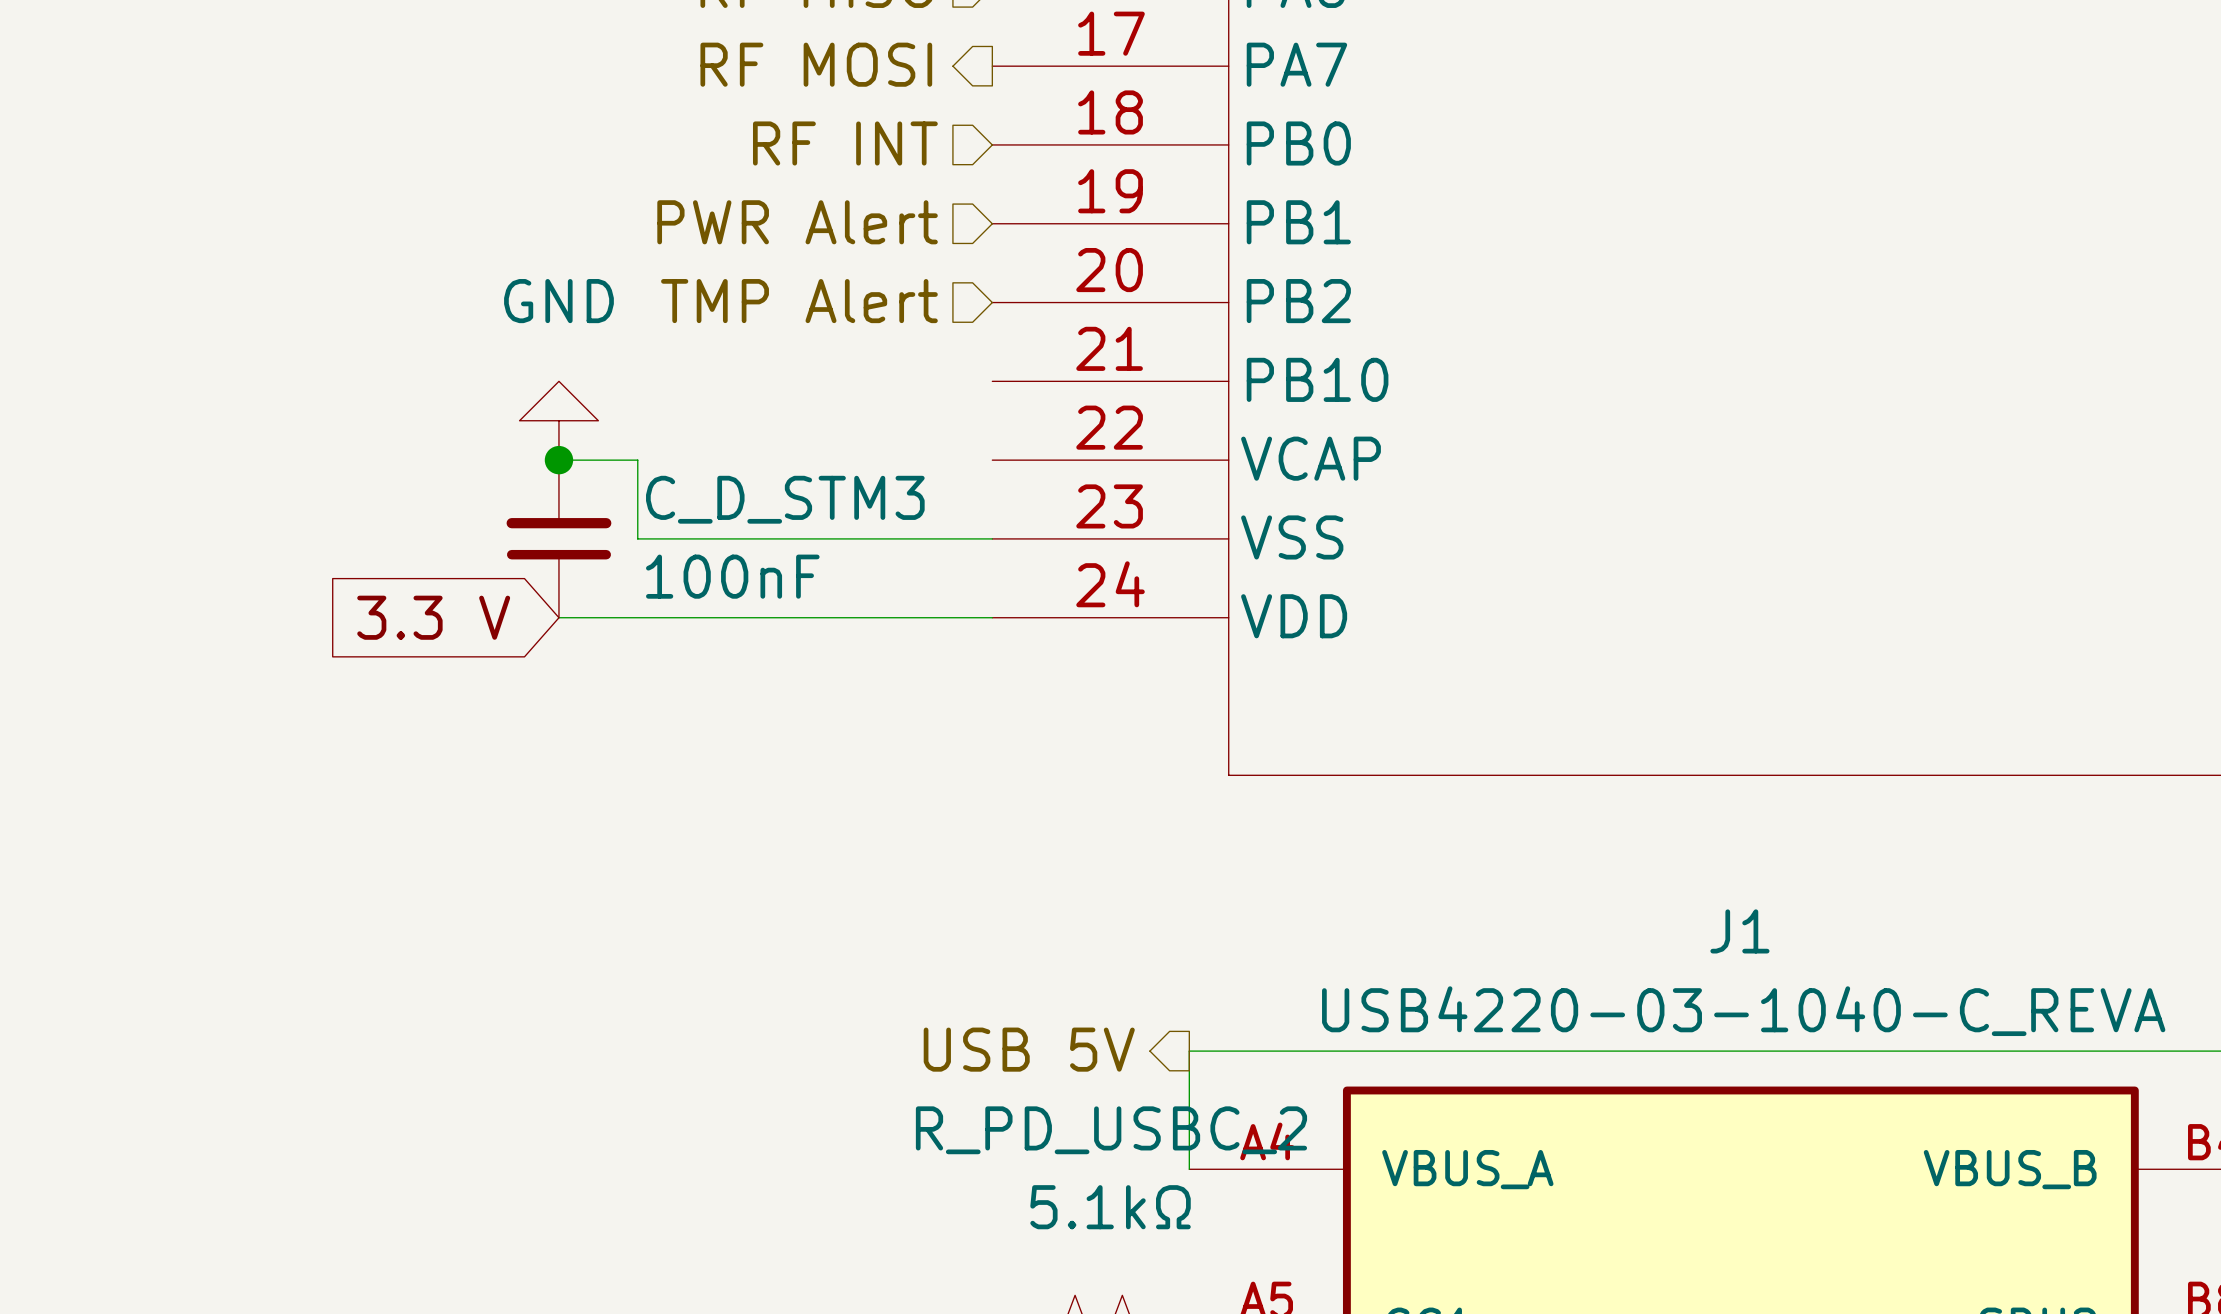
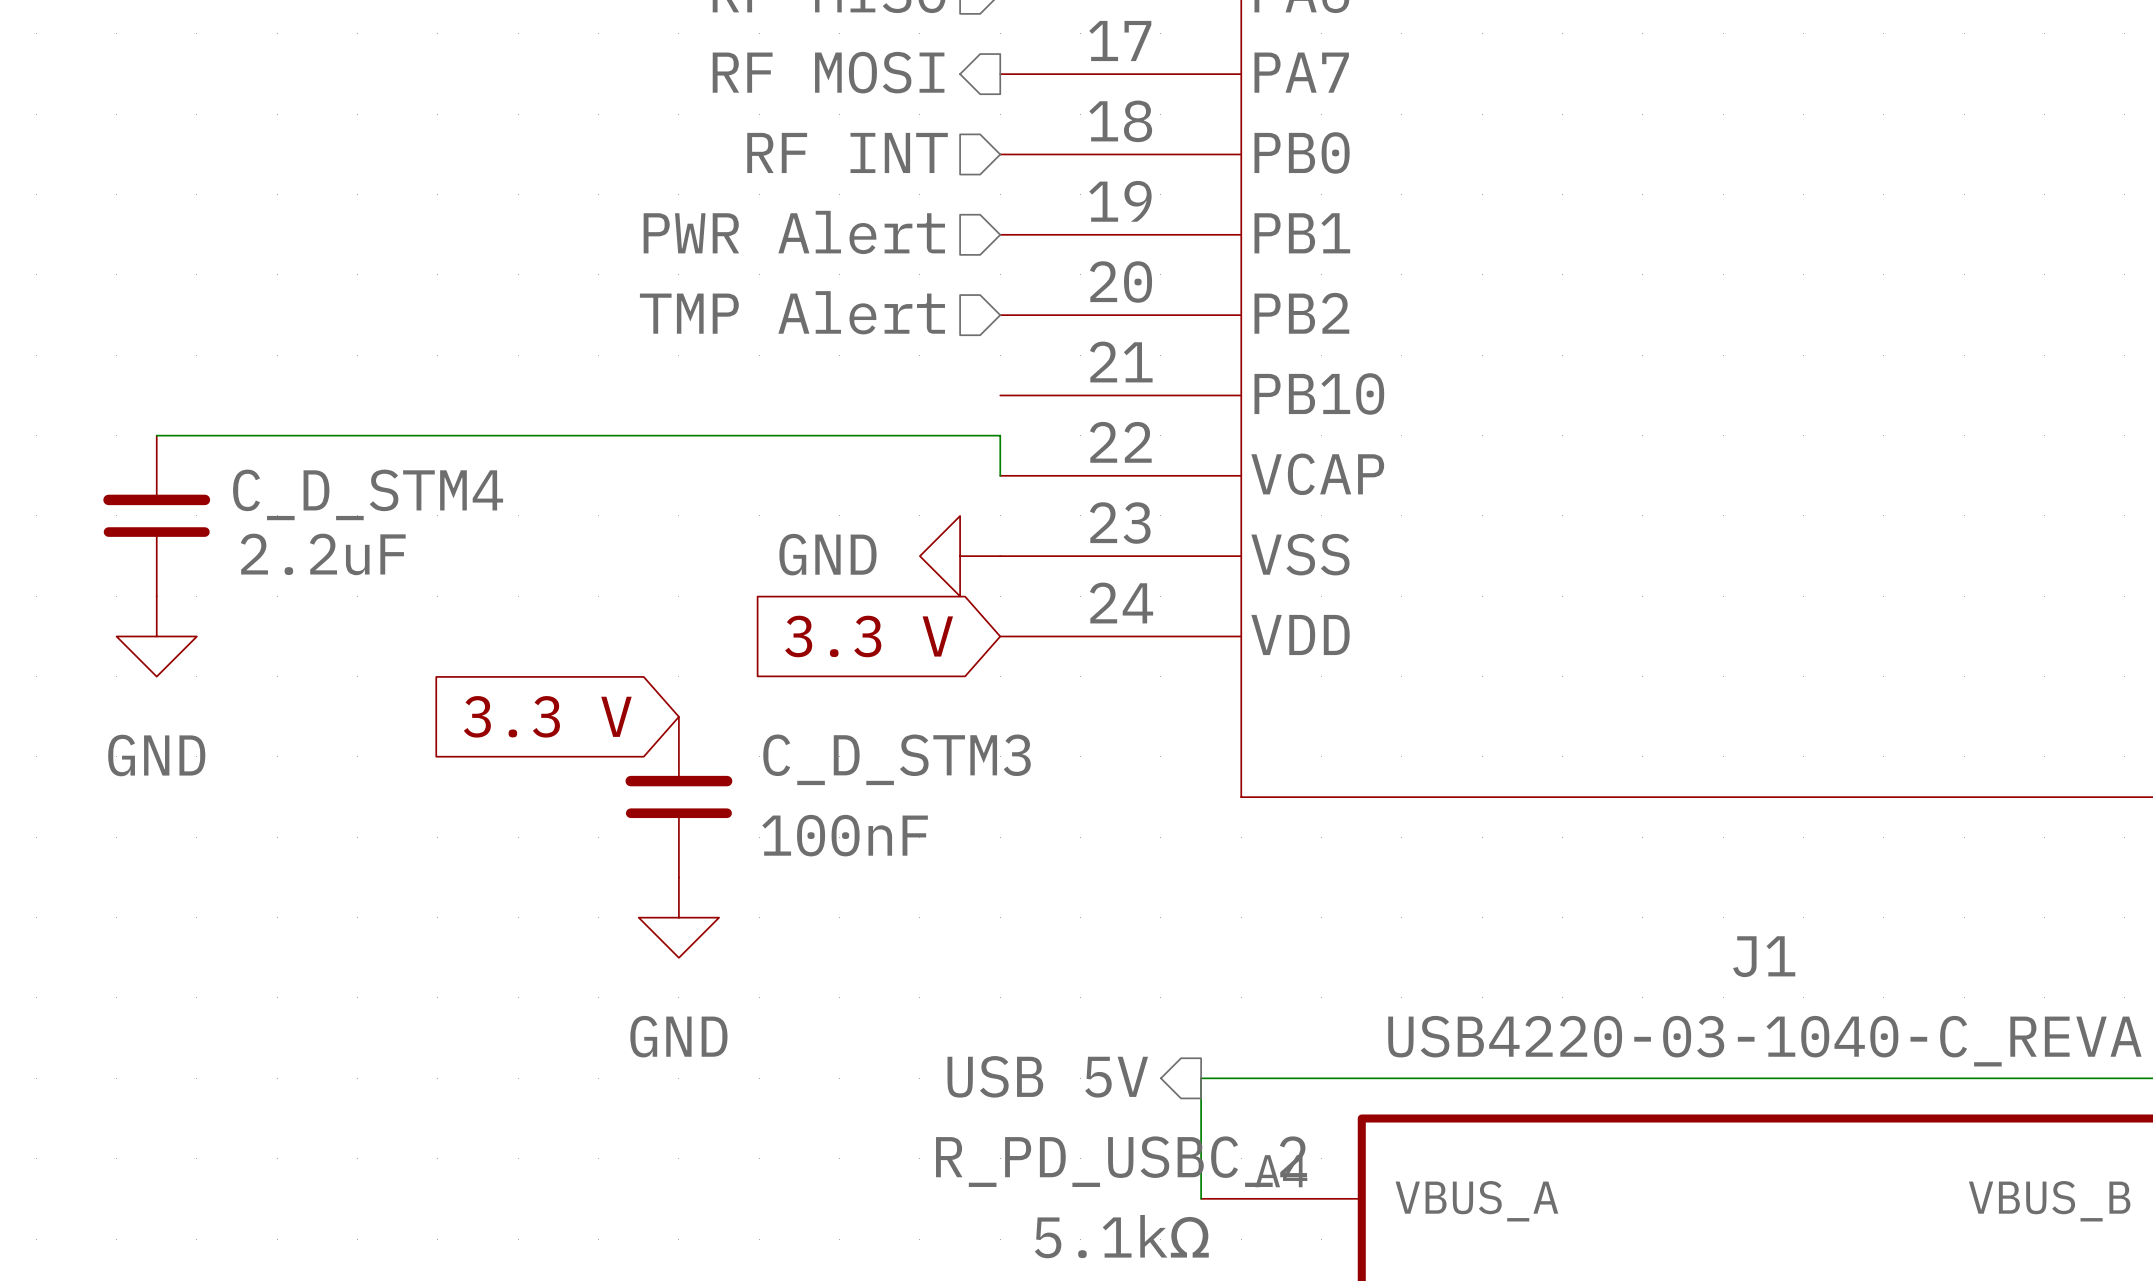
wire: none -> (156, 435) (1000, 435) (1000, 475)
power symbol: GND (558, 420) -> none
wire: (558, 460) (637, 460) (637, 538) (992, 538) -> none
junction: (558, 460) -> none
C_D_STM4: none -> 2.2uF (156, 515)
C_D_STM3 position: (558, 538) -> (678, 797)
power symbol: none -> GND (960, 556)
power symbol: none -> GND (156, 636)
global label position: 3.3 V (433, 617) -> 3.3 V (547, 716)
wire: (558, 617) (992, 617) -> none
global label: none -> 3.3 V (869, 636)
power symbol: none -> GND (678, 917)

